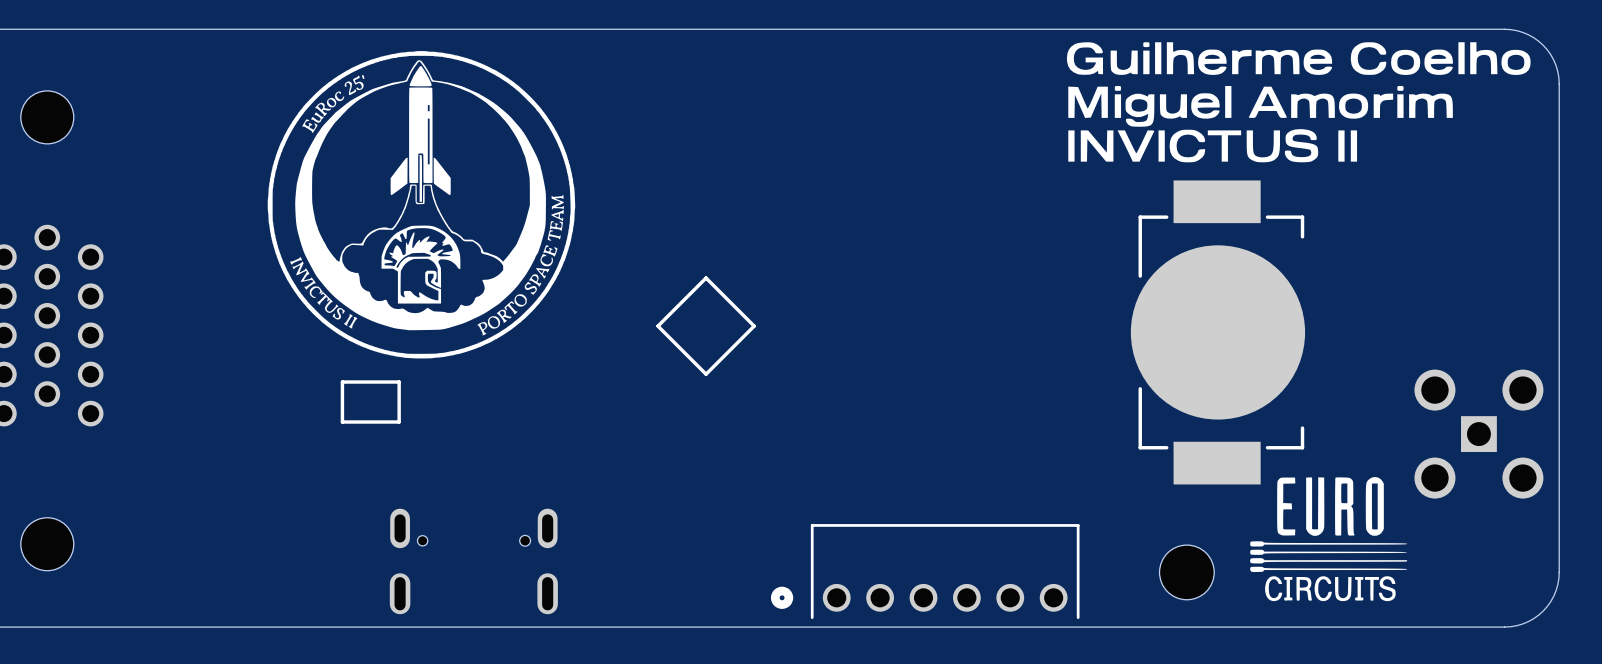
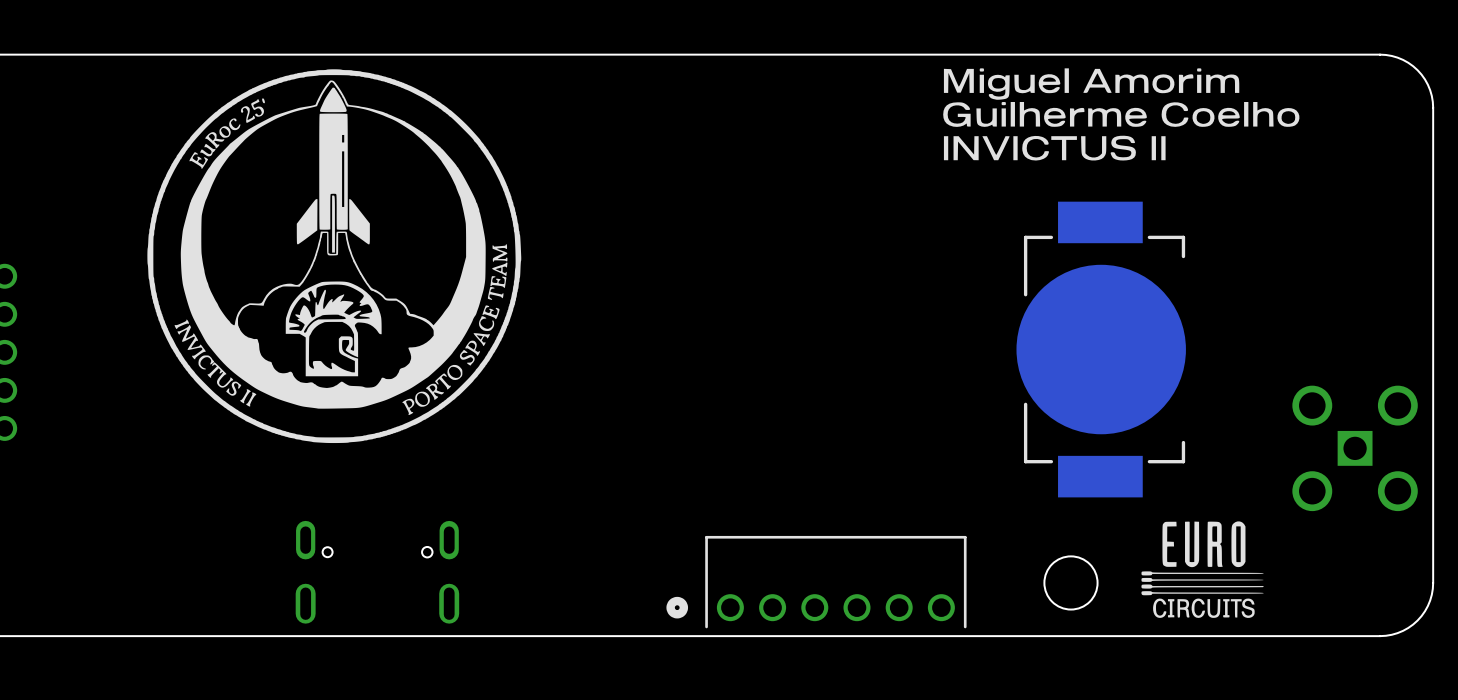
drawing: [1066, 42, 1531, 163] -> none
drawing: none -> [943, 68, 1300, 161]
drawing: none -> [147, 69, 522, 444]
drawing: [267, 51, 576, 359] -> none
line: (706, 278) (754, 326) (706, 374) (657, 326) (706, 278) -> none
line: (399, 382) (342, 382) (342, 422) (399, 422) (399, 382) -> none
drawing: [1250, 477, 1408, 602] -> none
drawing: none -> [1141, 521, 1264, 618]

